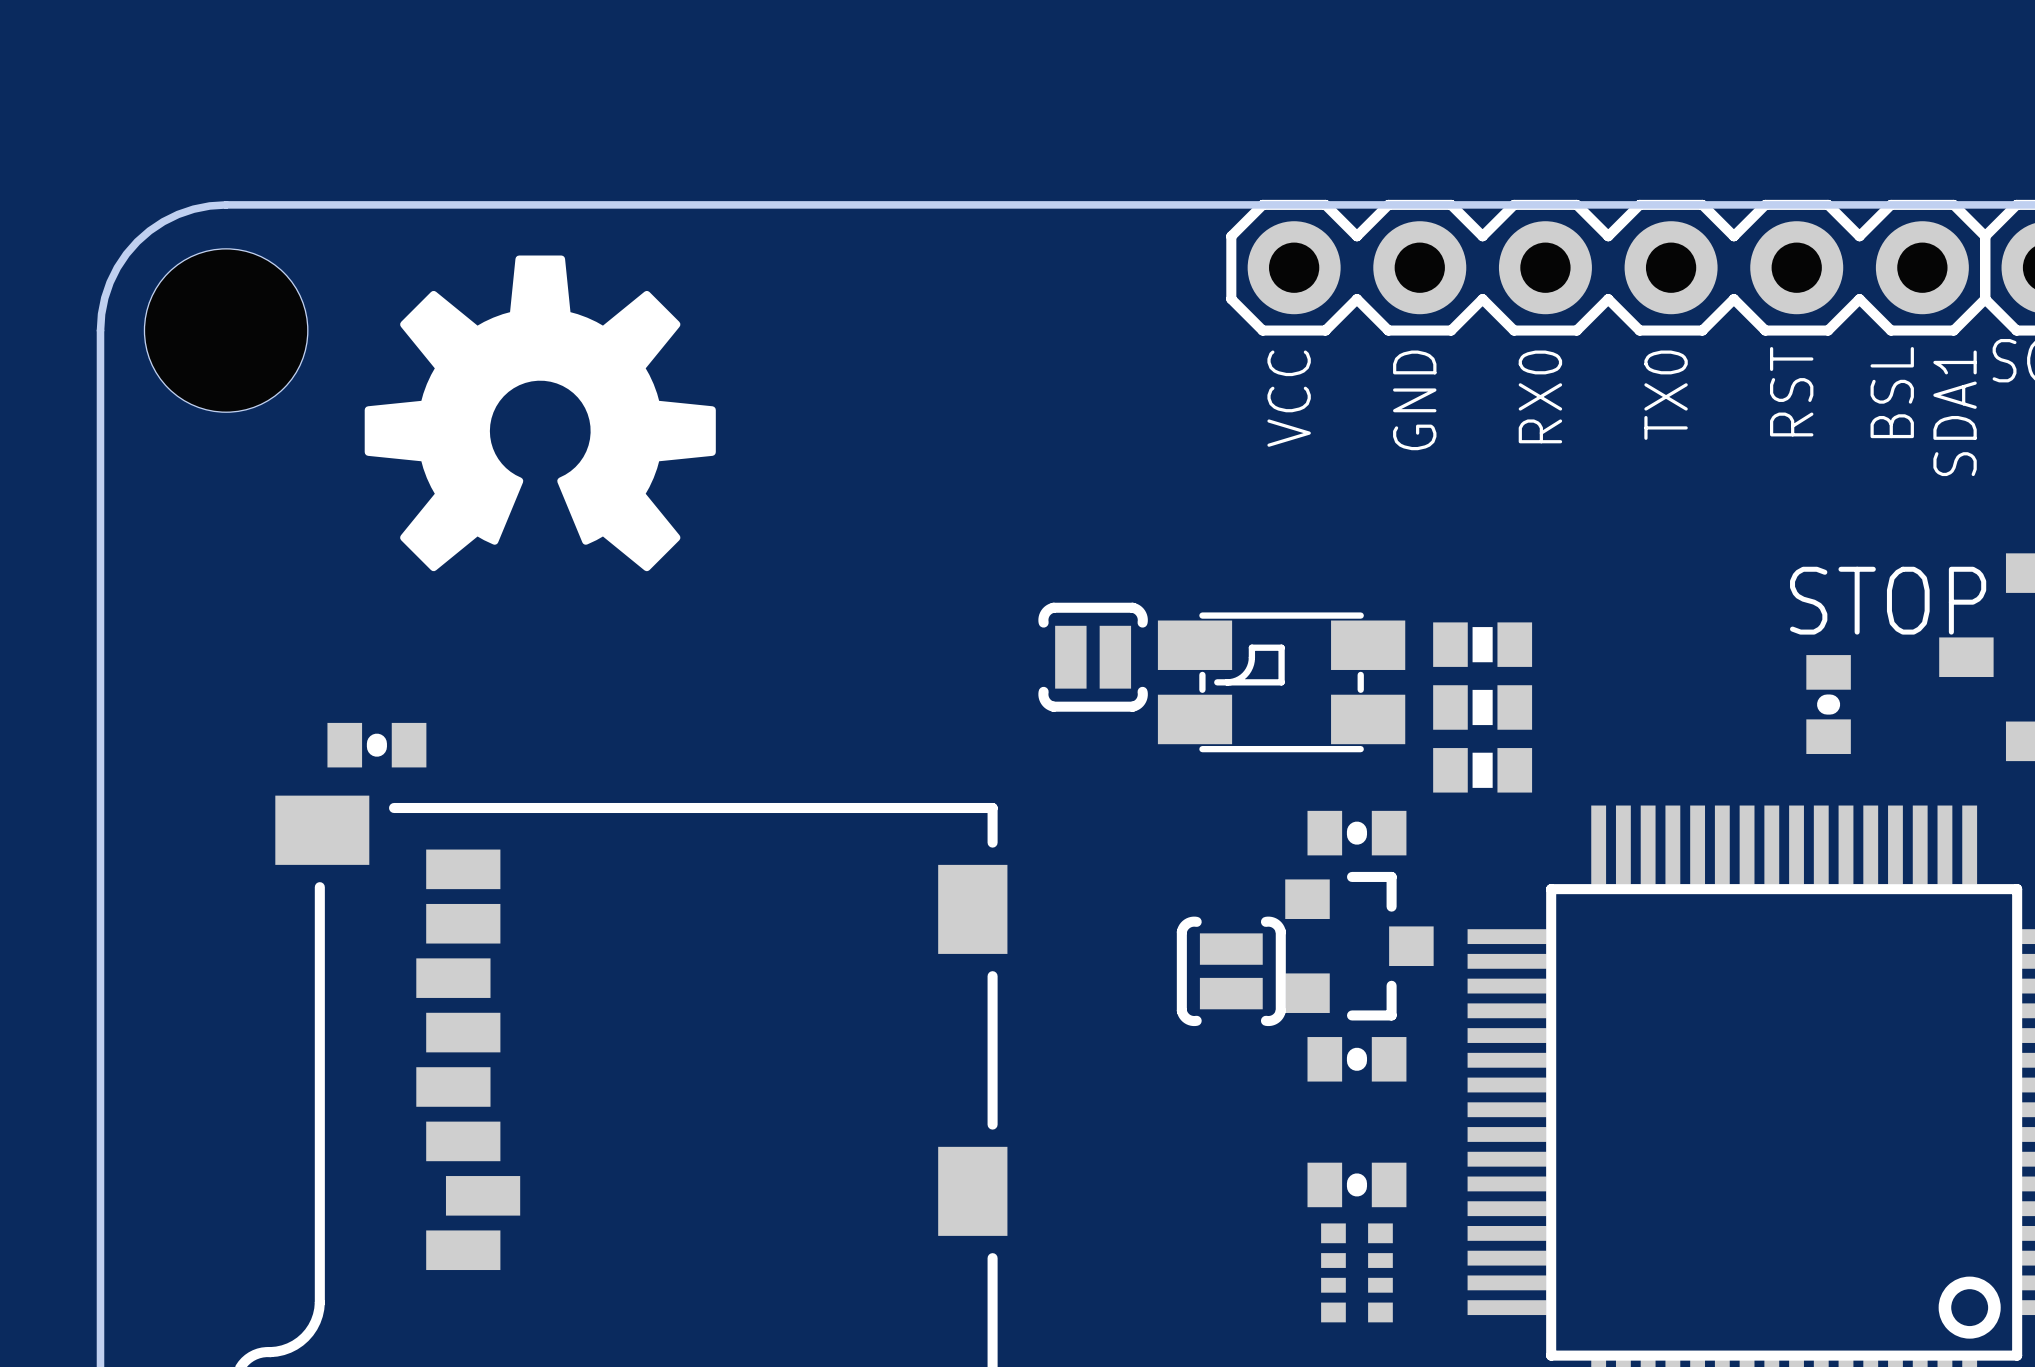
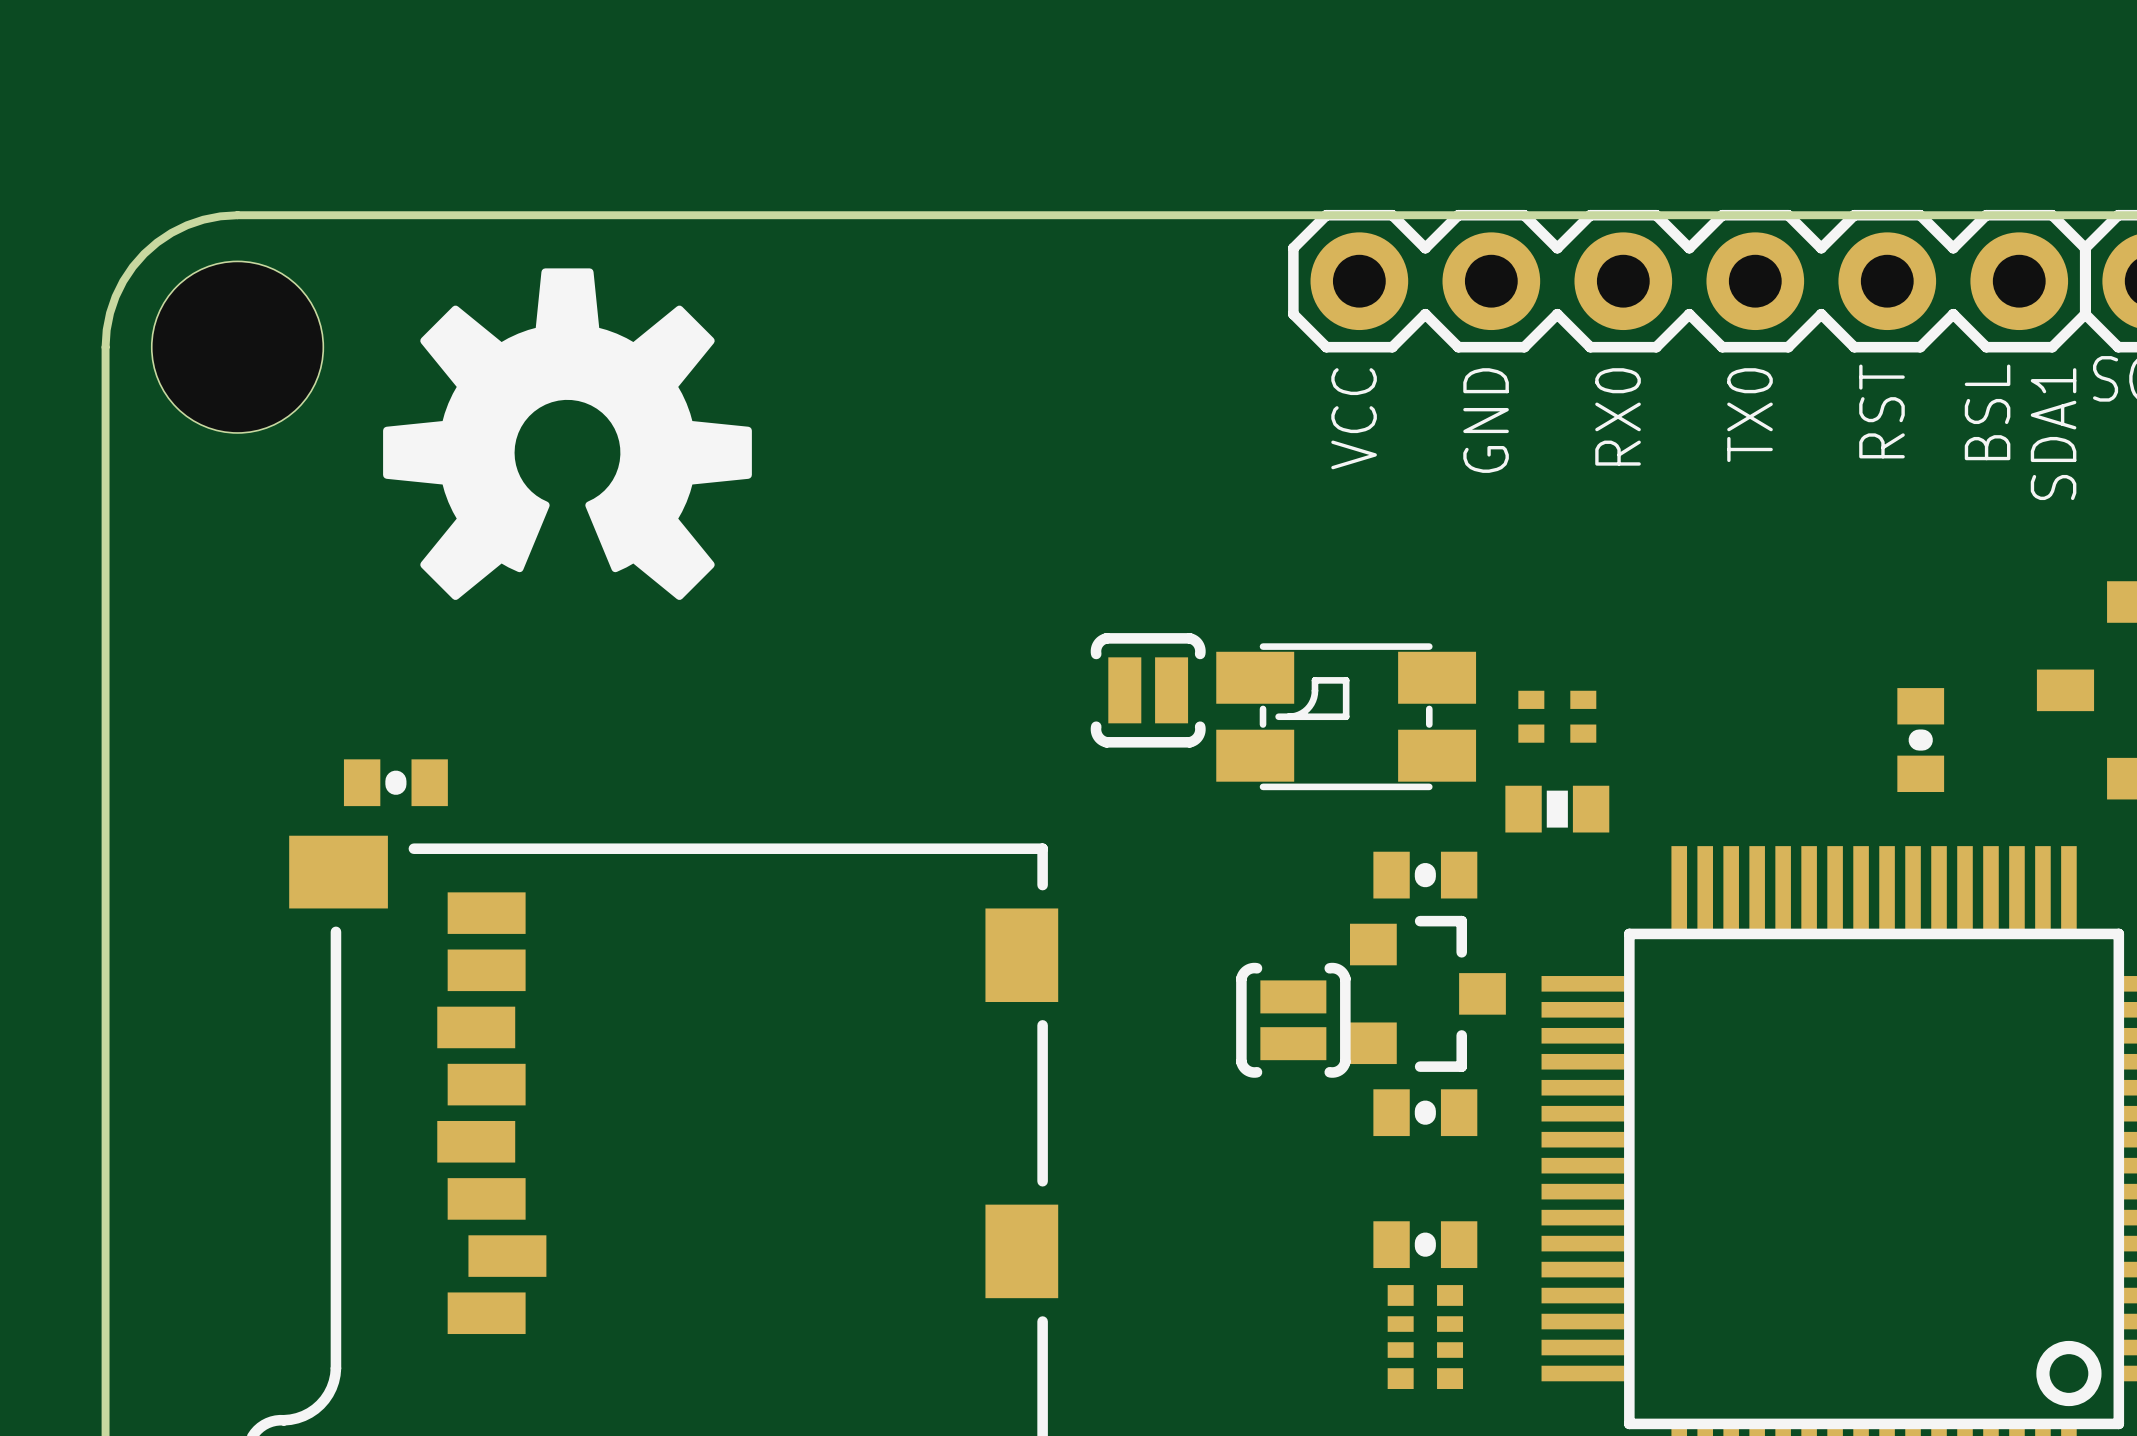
text: STOP (1888, 600) -> none
part: (1482, 644) -> none
part: none -> (1557, 716)
part: (1482, 707) -> none

